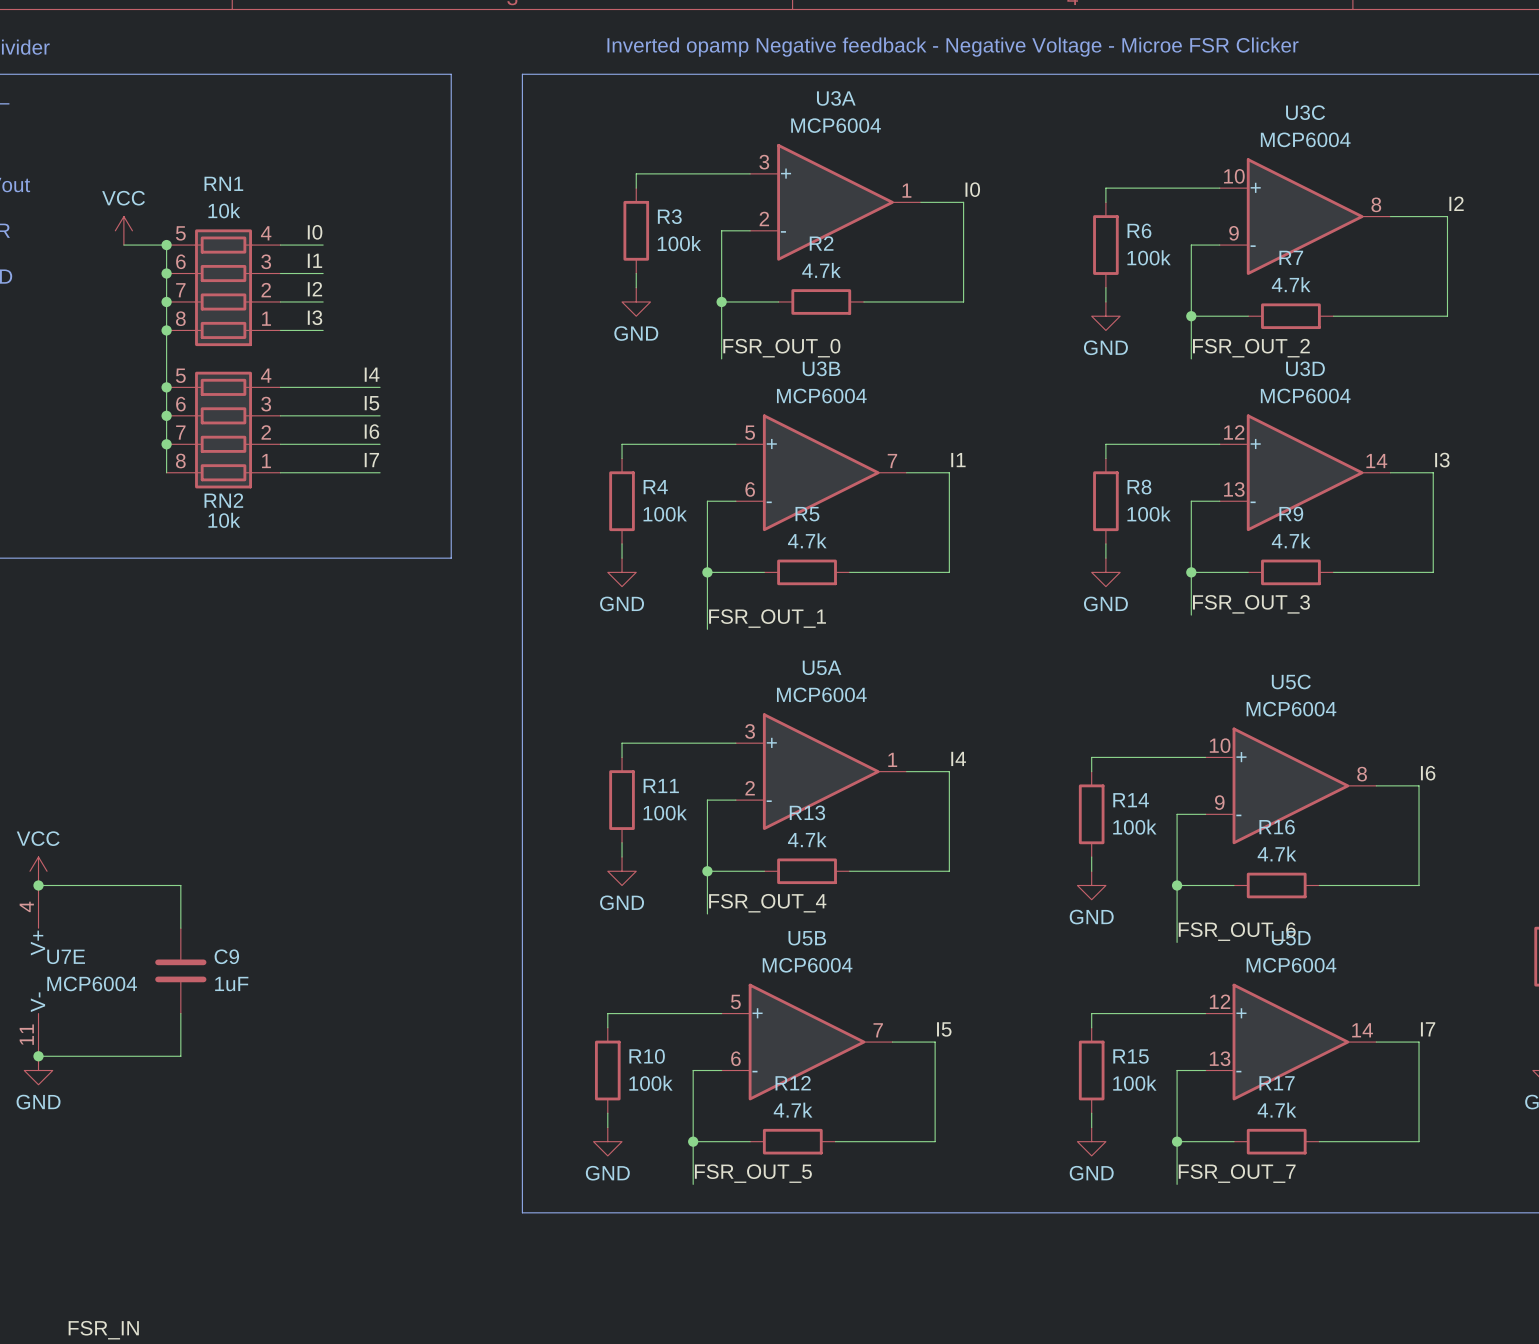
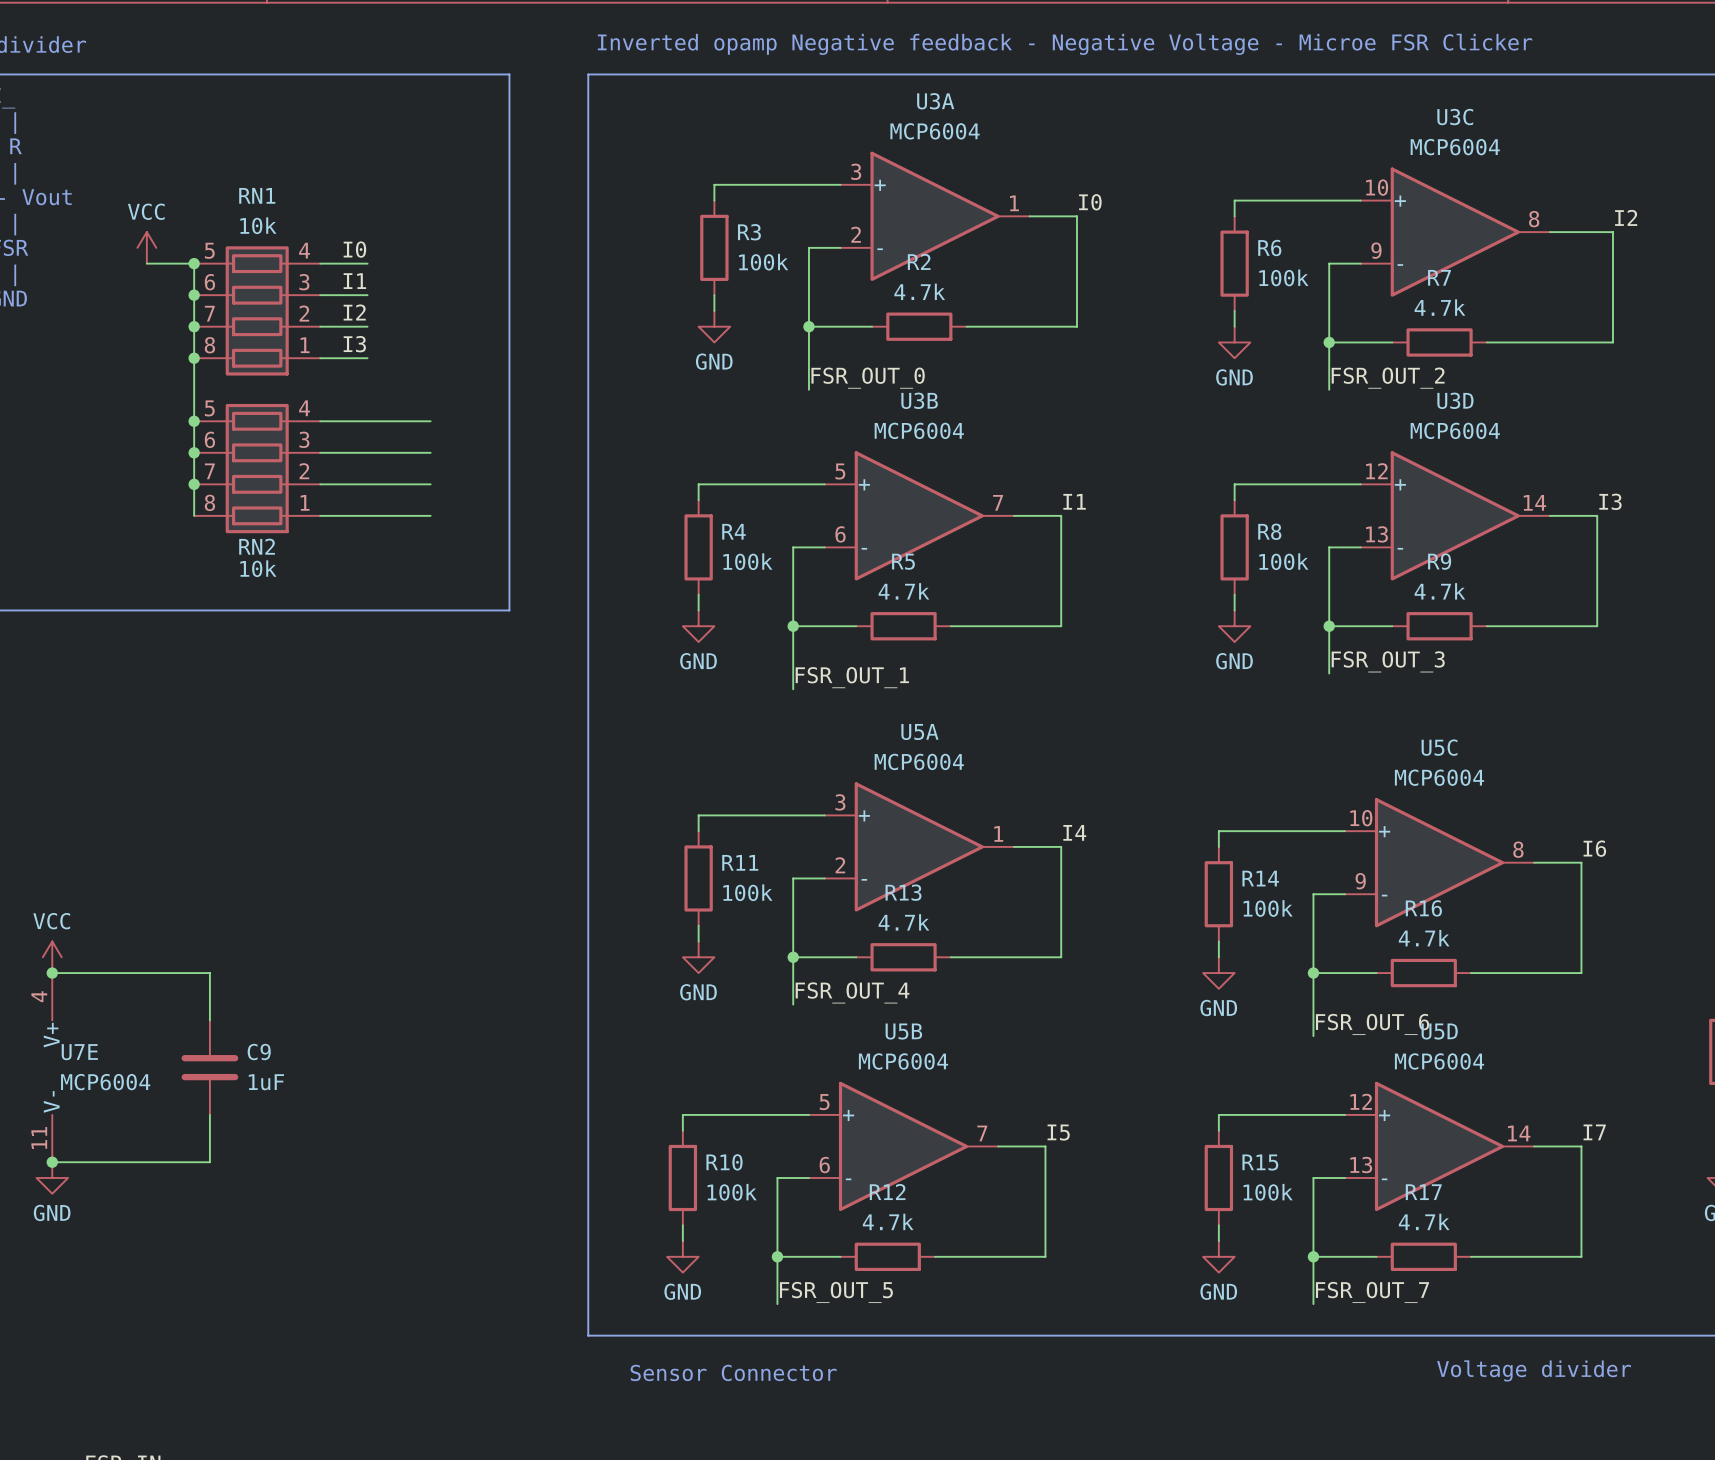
label: I4 (372, 374) -> none
label: I5 (371, 403) -> none
label: I6 (371, 431) -> none
label: I7 (371, 460) -> none
text: none -> Voltage divider (1534, 1370)
text: none -> Sensor Connector (733, 1372)

